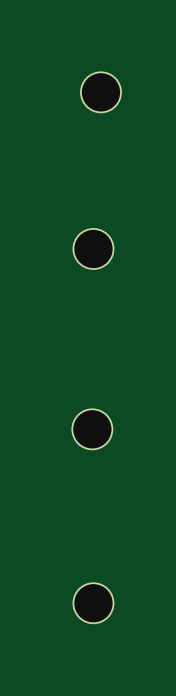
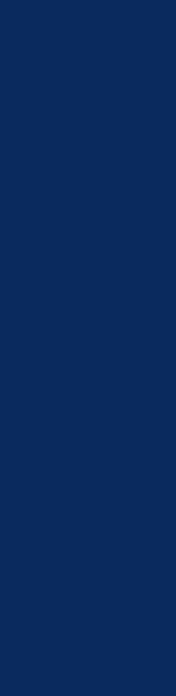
part: (100, 92) -> none
part: (93, 248) -> none
part: (92, 429) -> none
part: (93, 603) -> none

